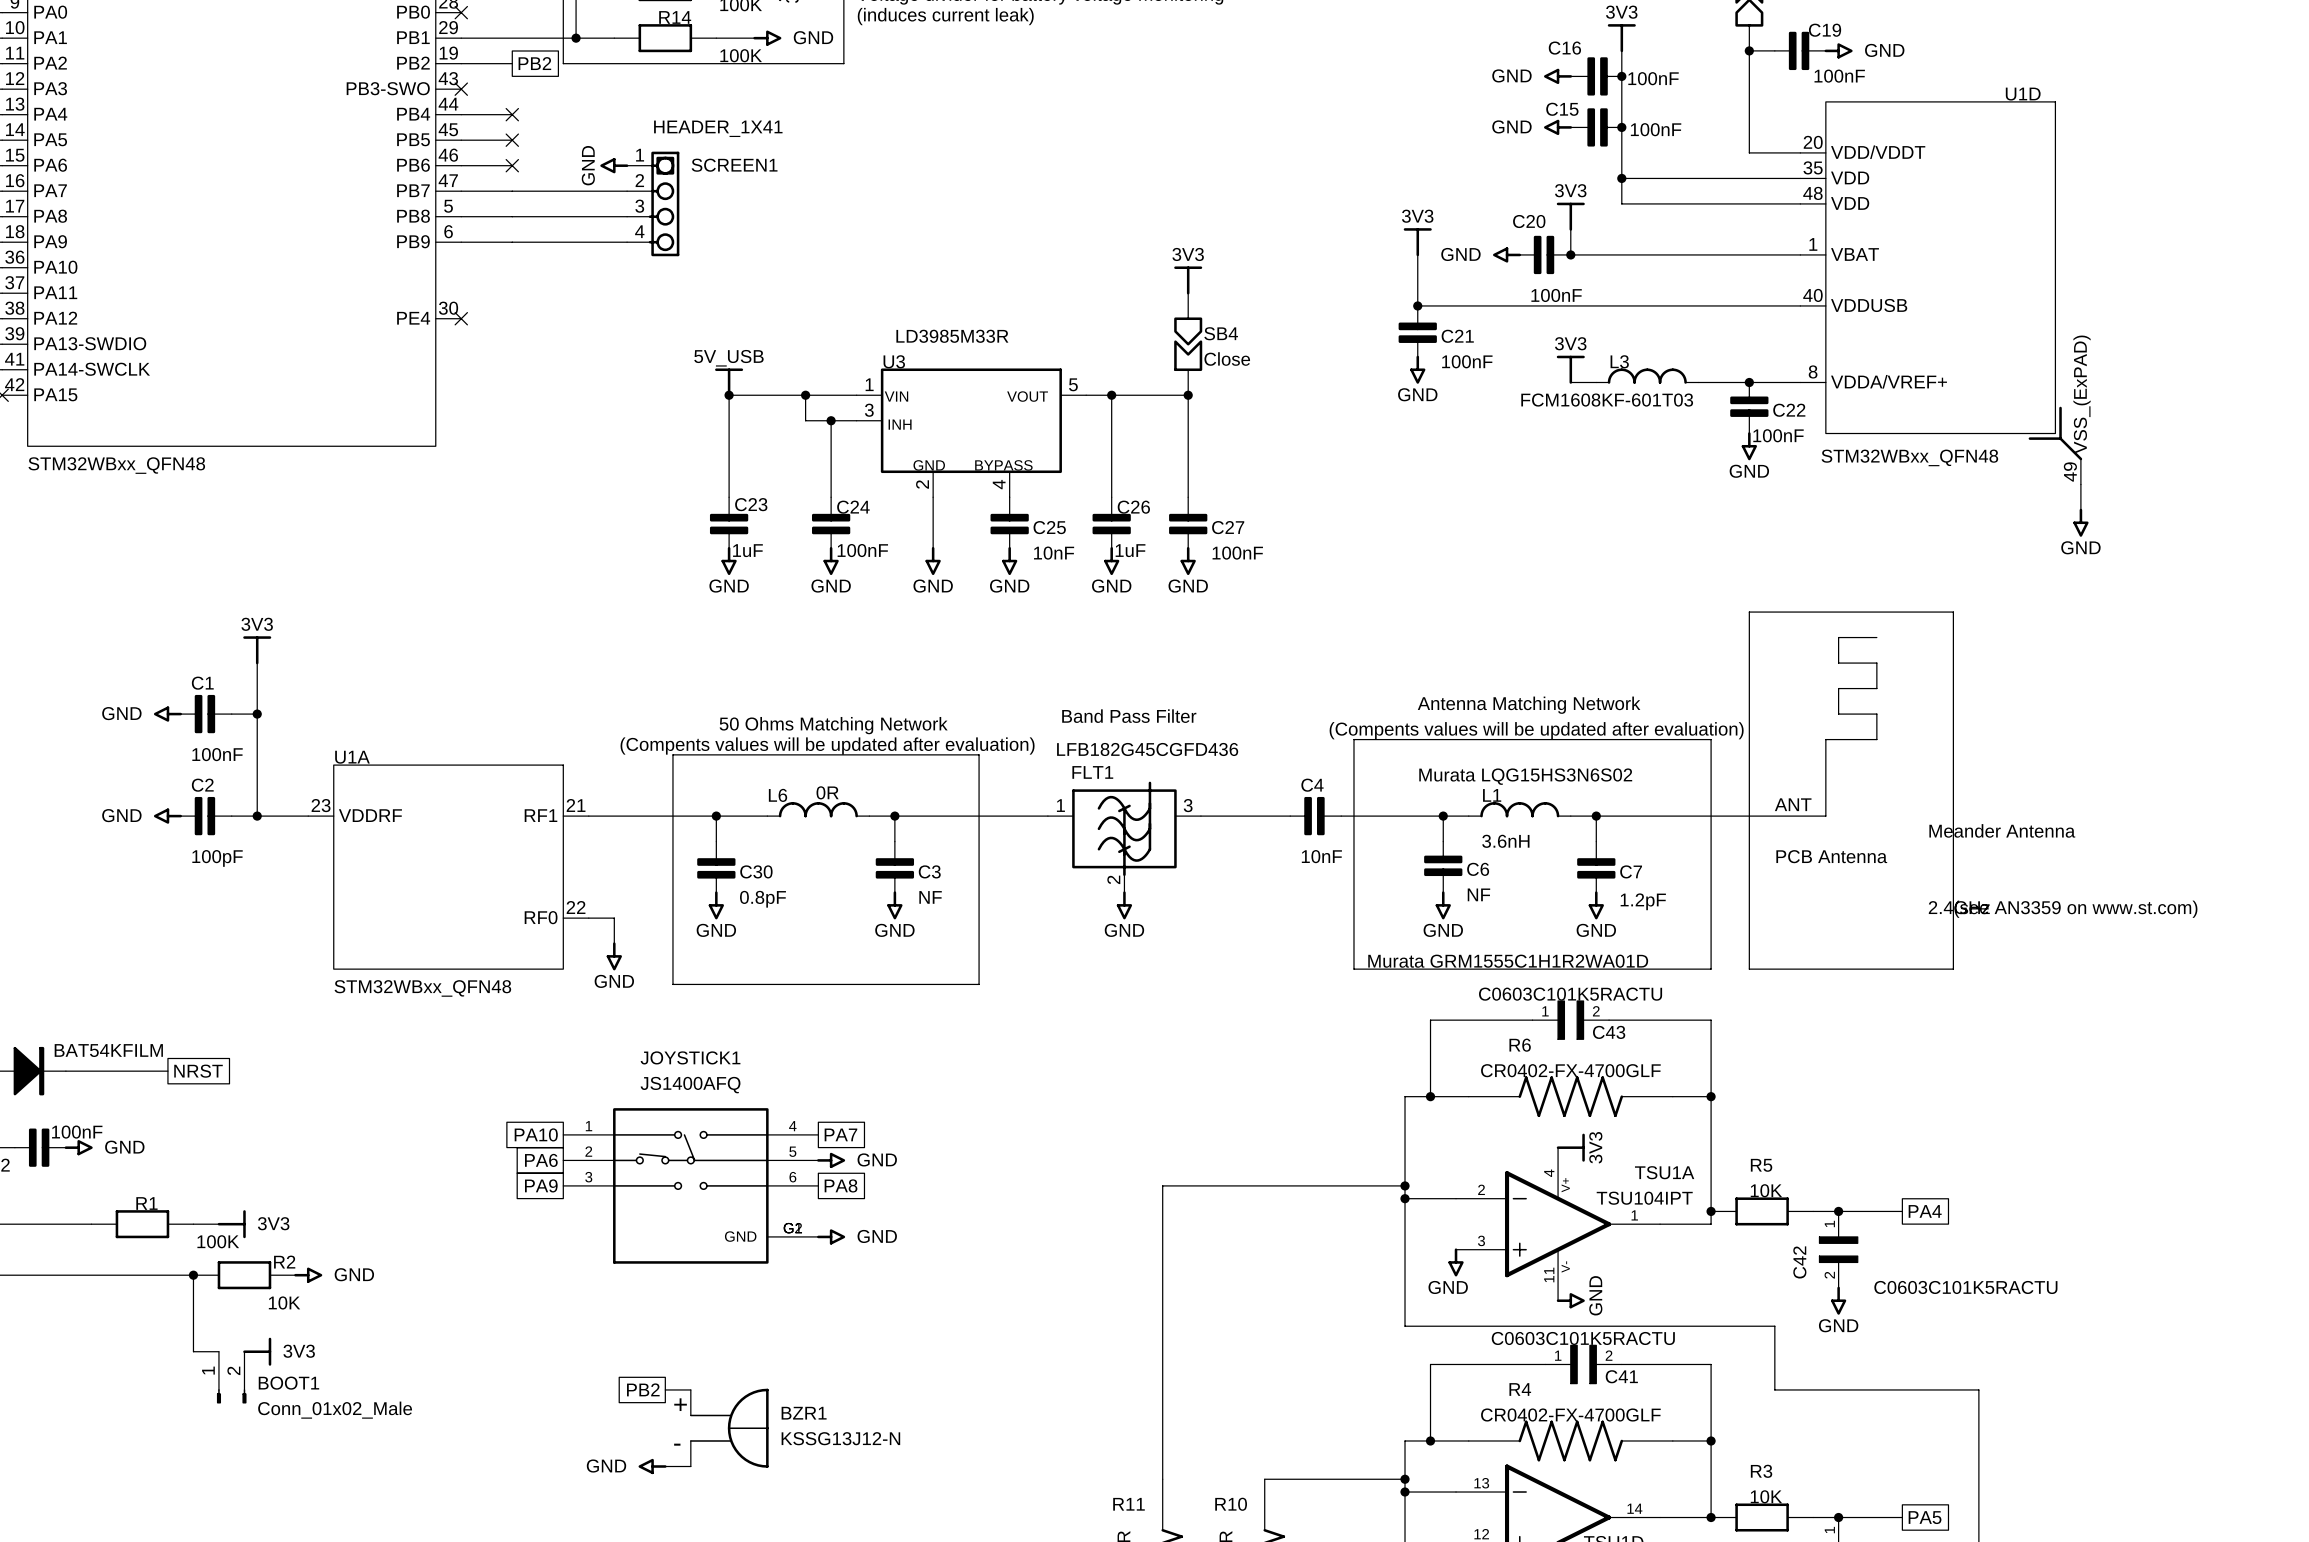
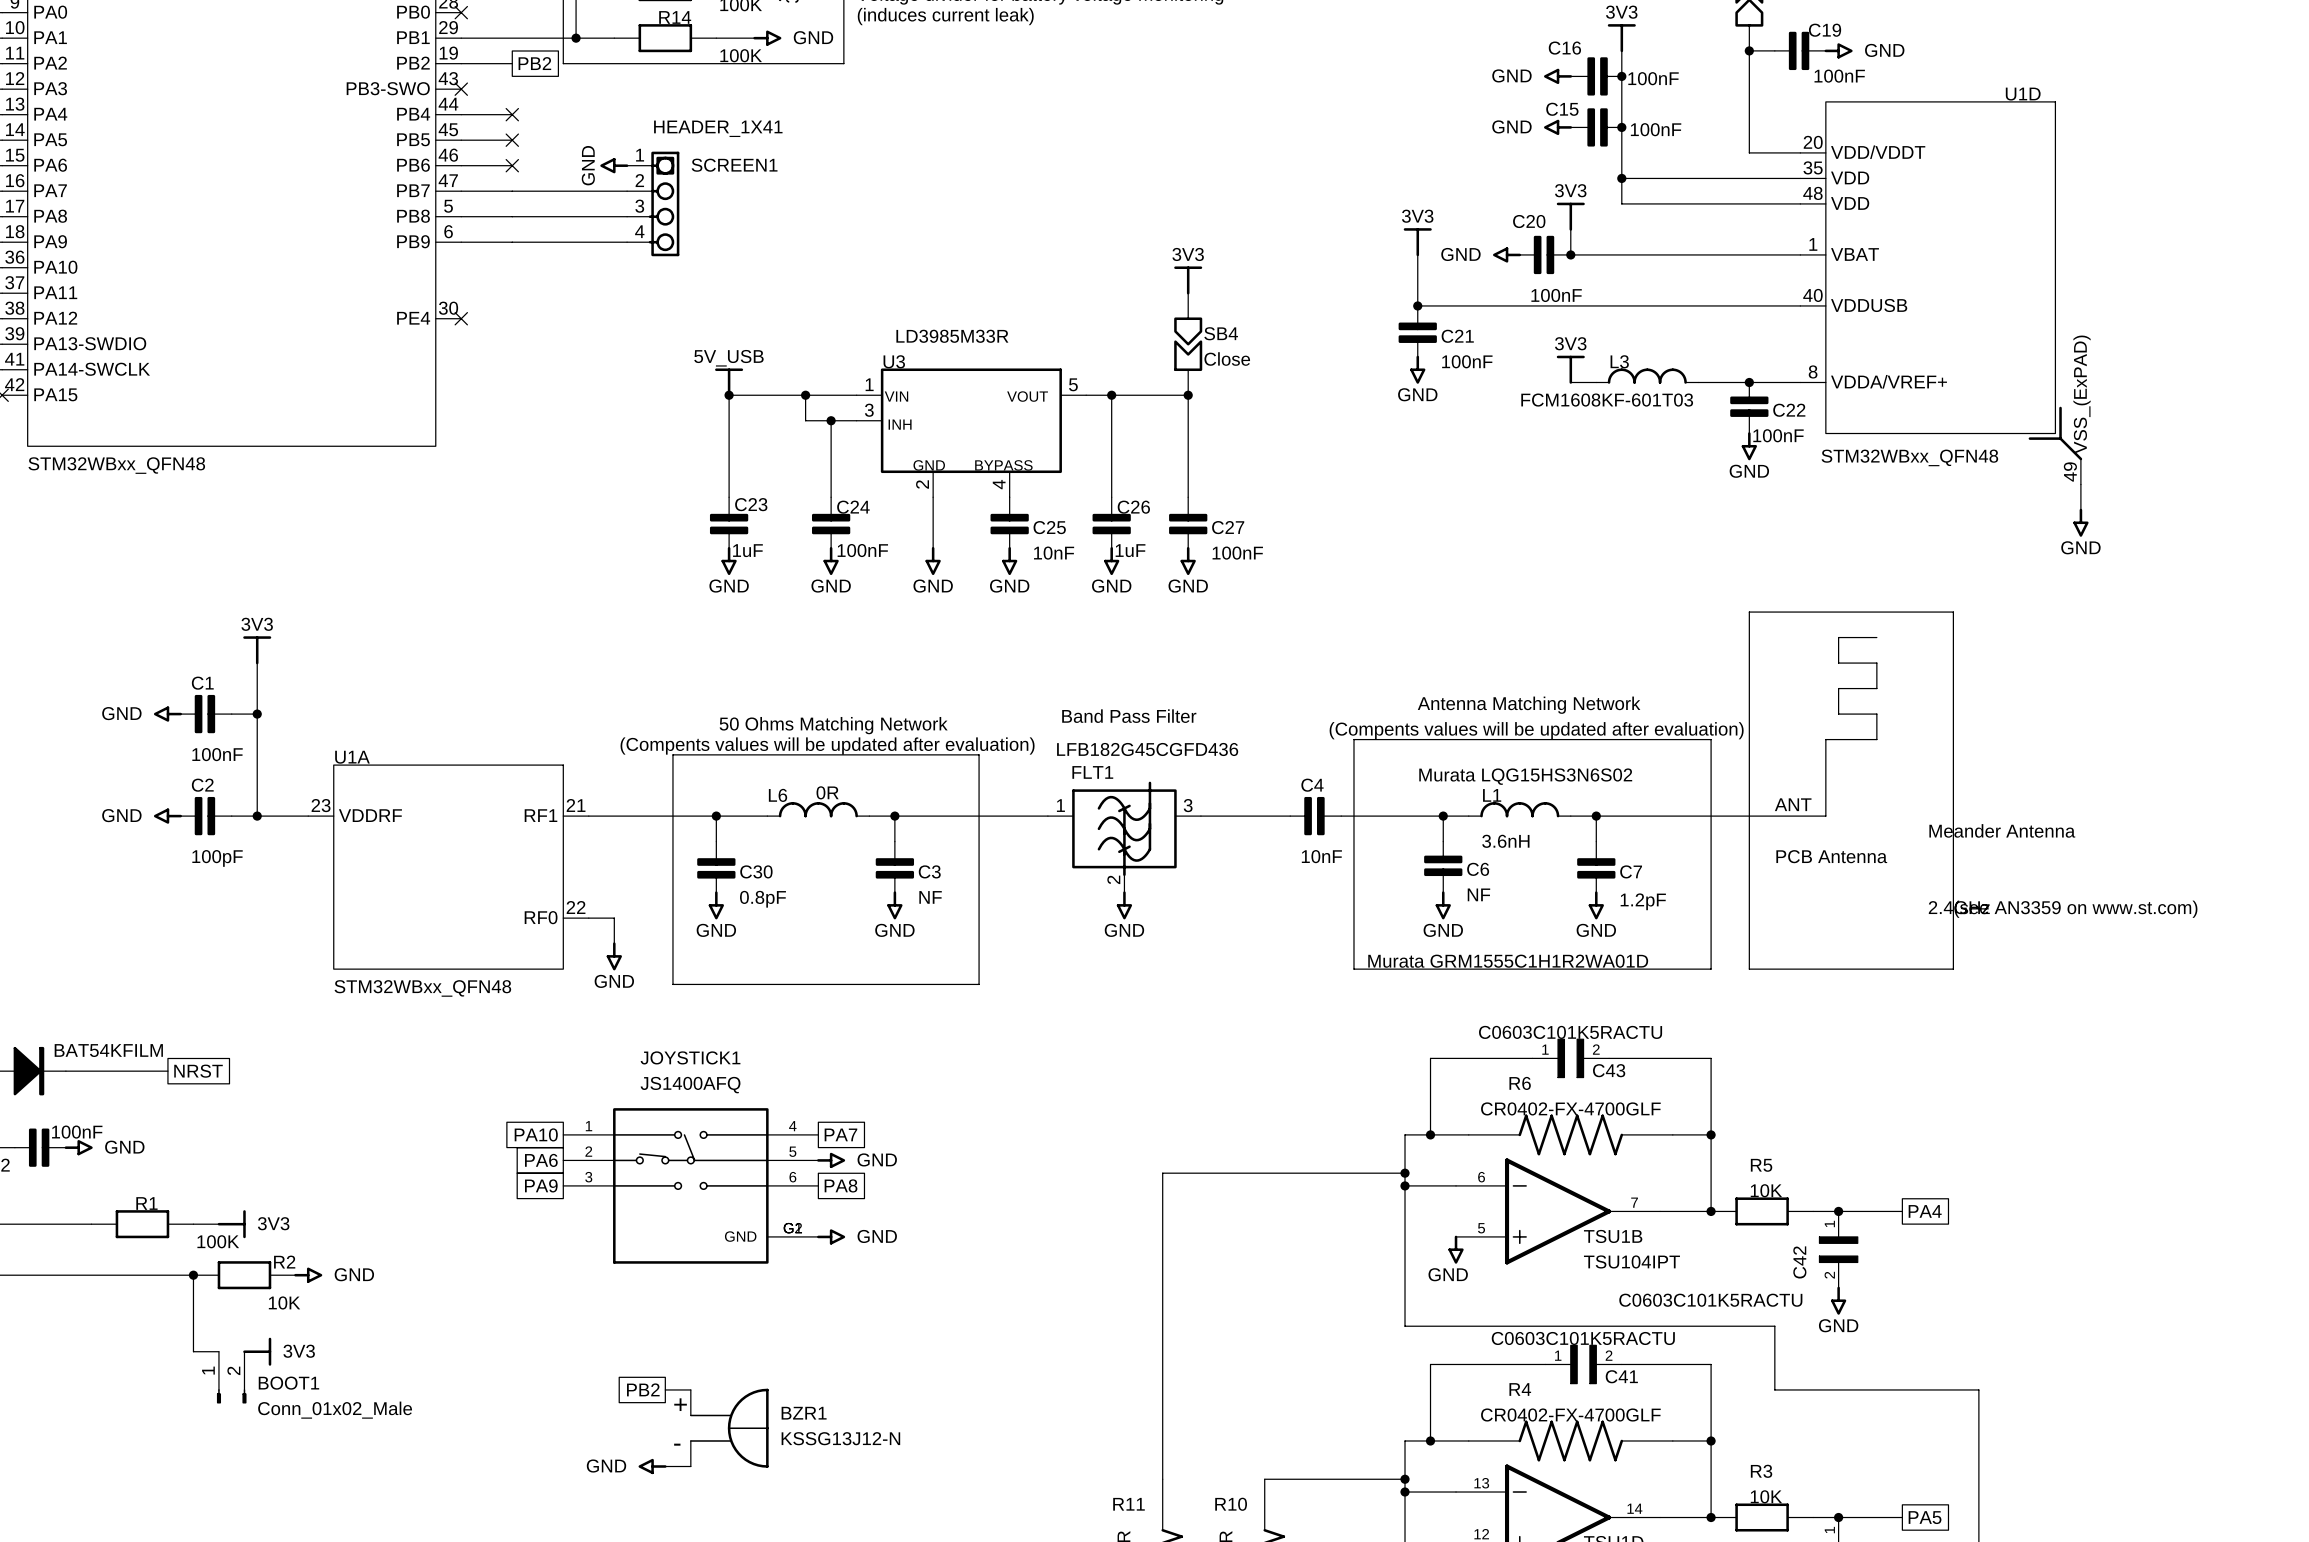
wire: (1532, 1020) (1430, 1020) (1430, 1058) -> (1532, 1058) (1430, 1058)
C43 position: (1570, 1020) -> (1570, 1058)
wire: (1609, 1020) (1711, 1020) (1711, 1058) -> (1609, 1058) (1711, 1058)
wire: none -> (1430, 1096) (1430, 1134)
junction: (1430, 1096) -> none
wire: (1468, 1096) (1405, 1096) (1405, 1134) -> (1468, 1134) (1405, 1134)
R6 position: (1570, 1096) -> (1570, 1134)
wire: (1672, 1096) (1711, 1096) -> (1672, 1134) (1711, 1134)
junction position: (1711, 1096) -> (1711, 1134)
junction: none -> (1430, 1134)
power symbol: 3V3 (1570, 1147) -> none
wire: (1162, 1185) (1405, 1185) -> (1162, 1185) (1162, 1173) (1405, 1173)
wire: (1405, 1198) (1456, 1198) -> (1405, 1185) (1456, 1185)
junction position: (1405, 1198) -> (1405, 1173)
TSU1B: none -> TSU104IPT (1558, 1211)
wire: (1711, 1211) (1711, 1224) (1660, 1224) -> (1711, 1211) (1660, 1211)
TSU1A: TSU104IPT (1558, 1224) -> none
power symbol position: GND (1456, 1262) -> GND (1456, 1249)
C42 value position: C0603C101K5RACTU (1965, 1287) -> C0603C101K5RACTU (1710, 1300)
power symbol: GND (1570, 1300) -> none

